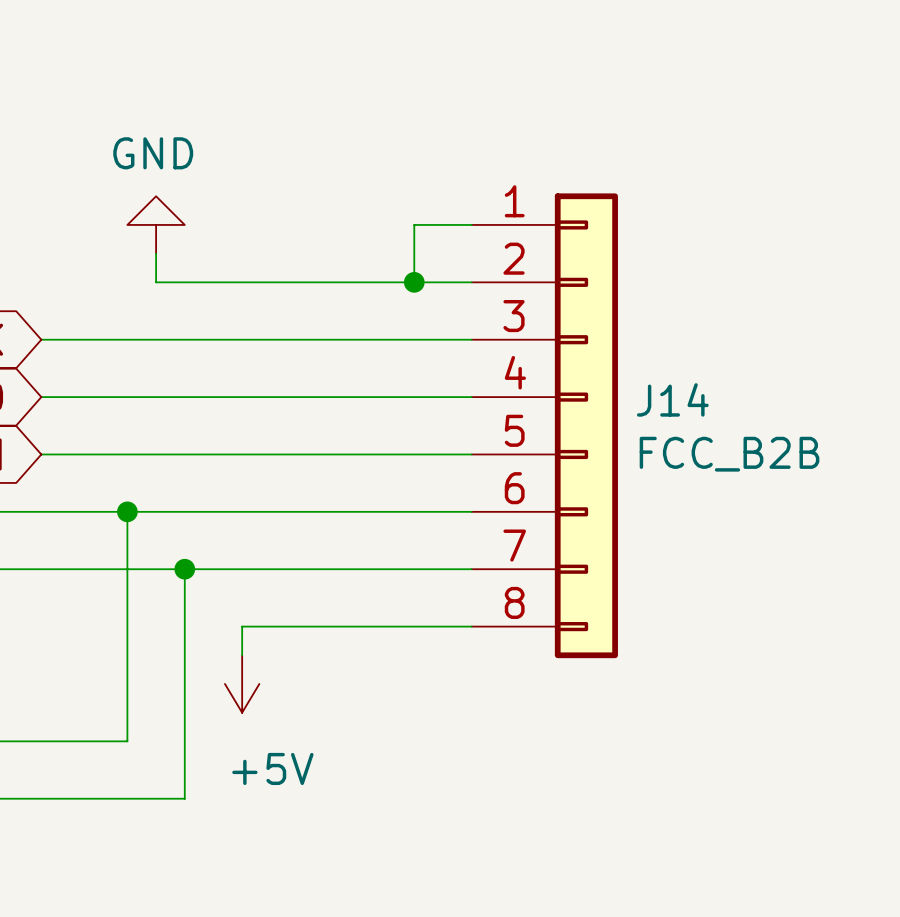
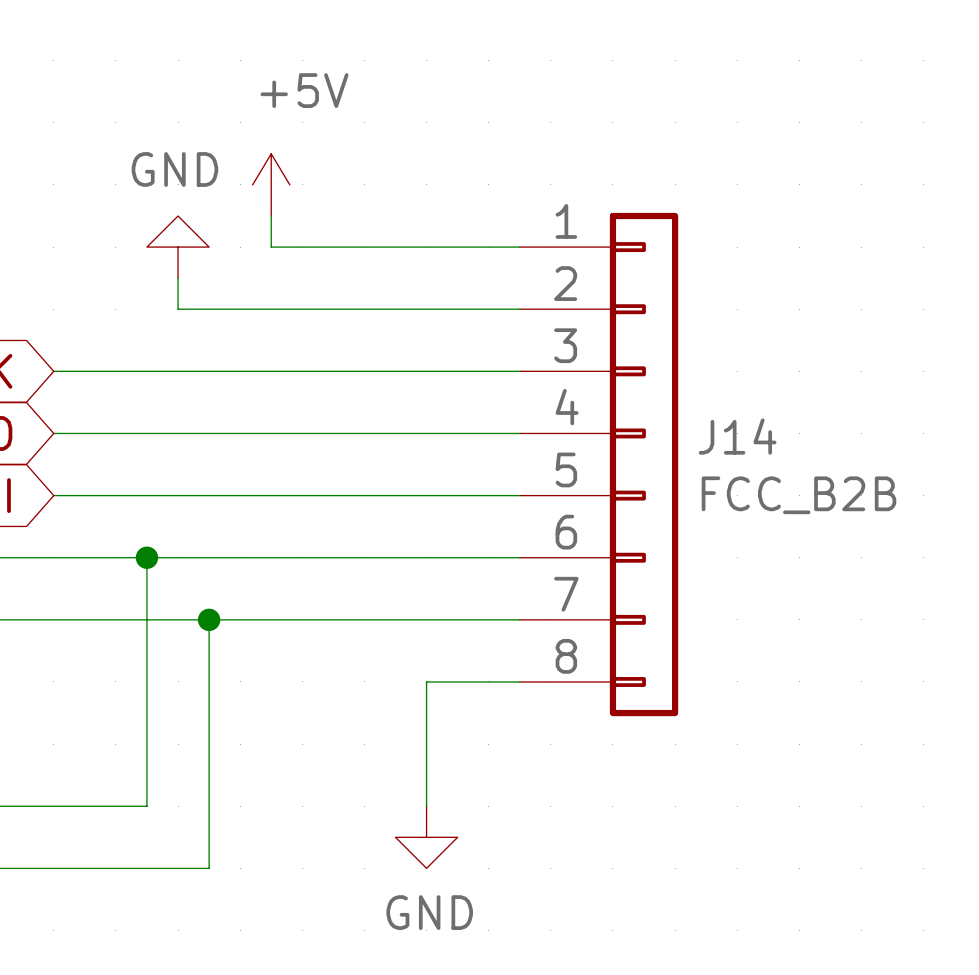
wire: (414, 224) (414, 282) -> (457, 247) (271, 247) (271, 216)
junction: (414, 282) -> none
wire: (385, 626) (242, 626) (242, 655) -> (426, 681) (426, 806)
power symbol rotation: 0° (242, 683) -> 180° (271, 184)
power symbol position: +5V (242, 683) -> +5V (271, 184)
power symbol text position: +5V (272, 768) -> +5V (304, 90)
power symbol: none -> GND (426, 837)

